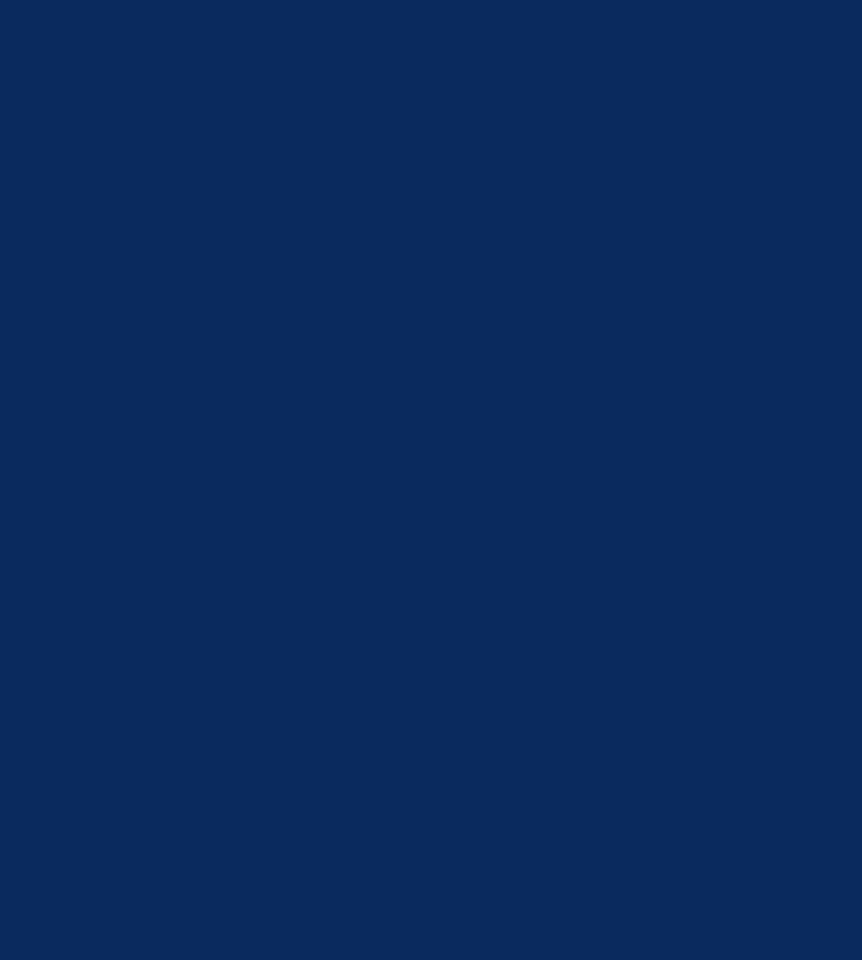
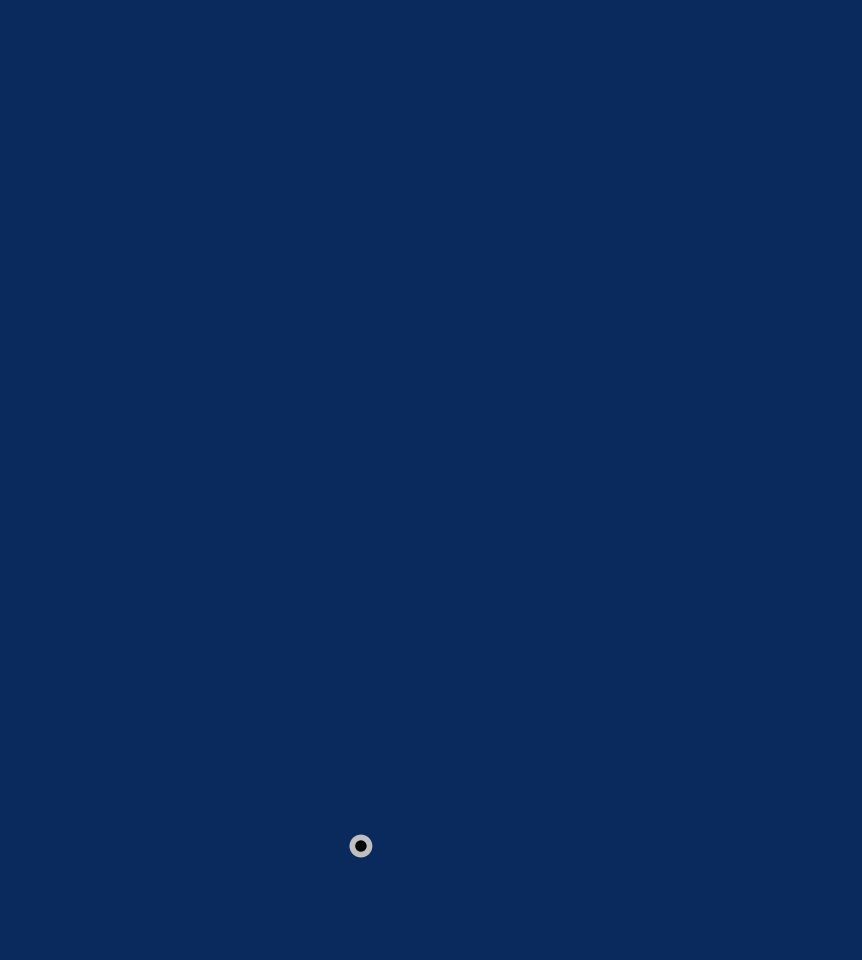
via: none -> (360, 846)

